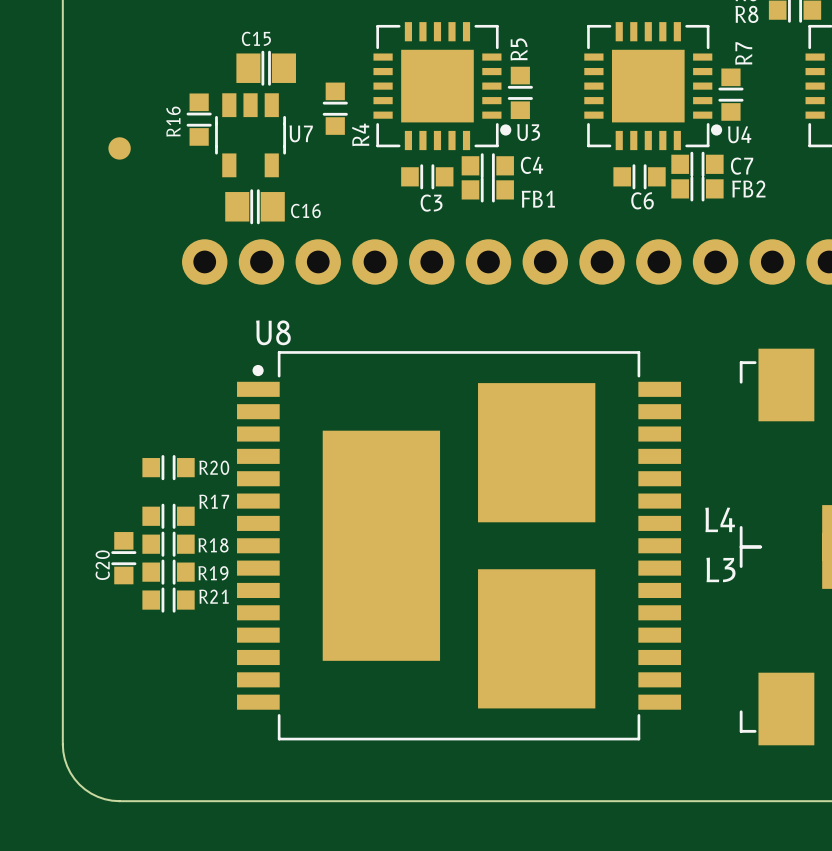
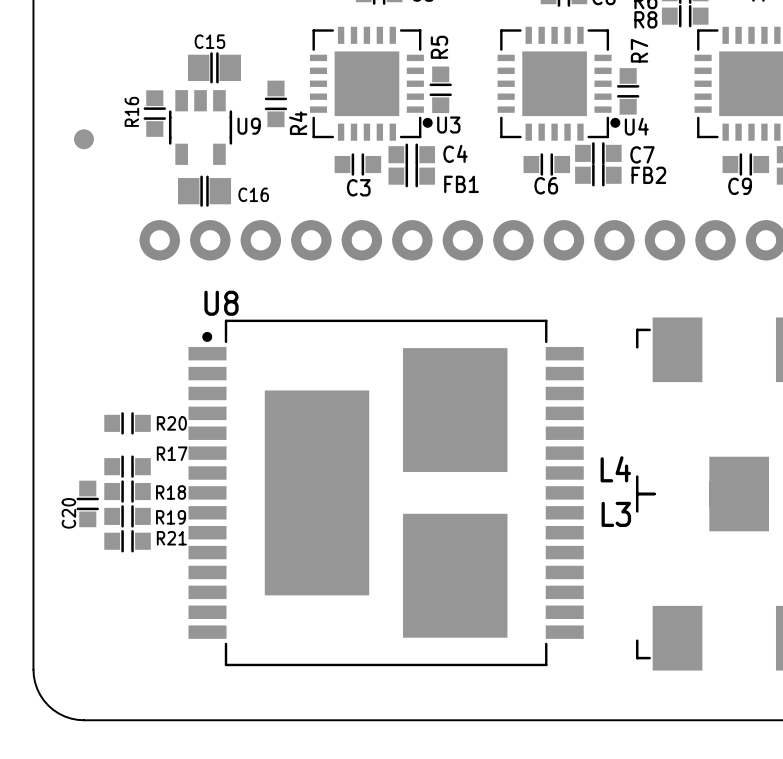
U7 name: U7 (301, 133) -> U9 (249, 126)

